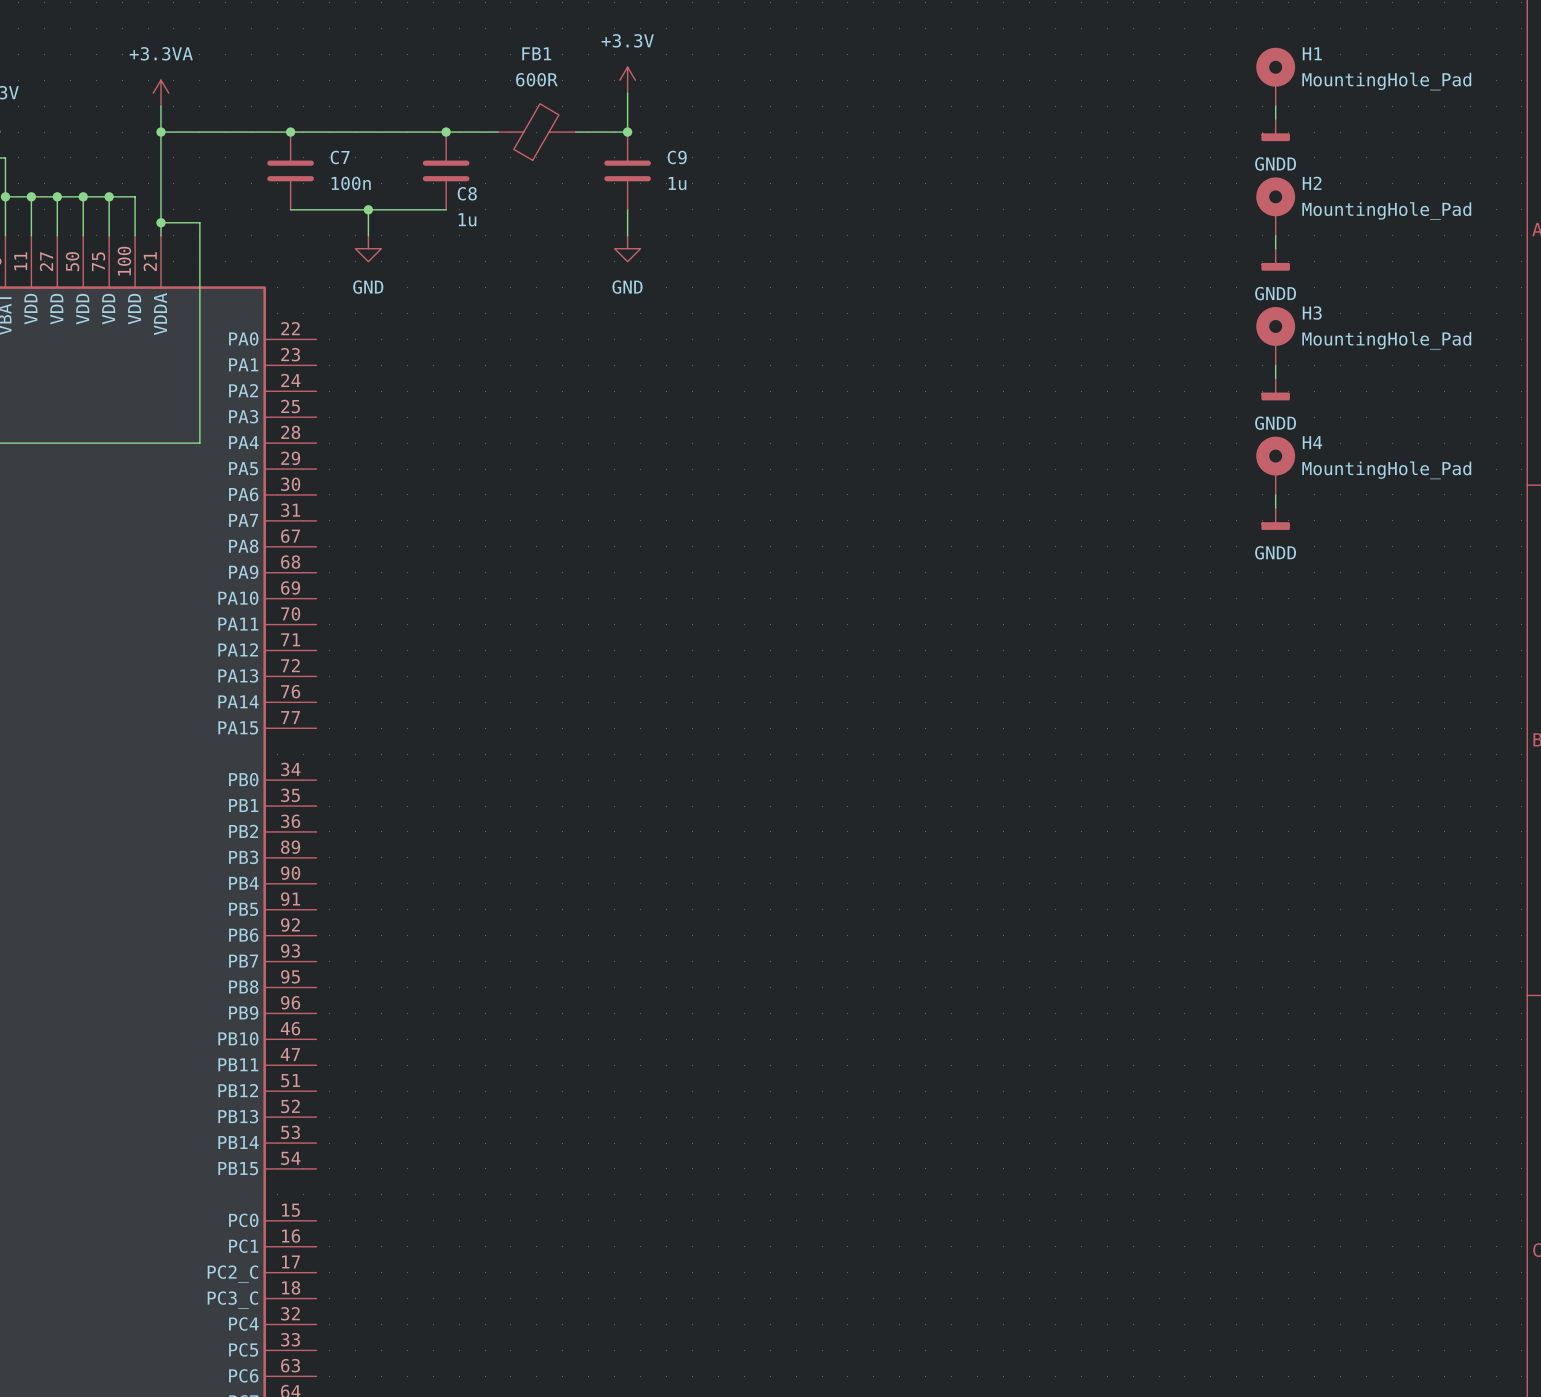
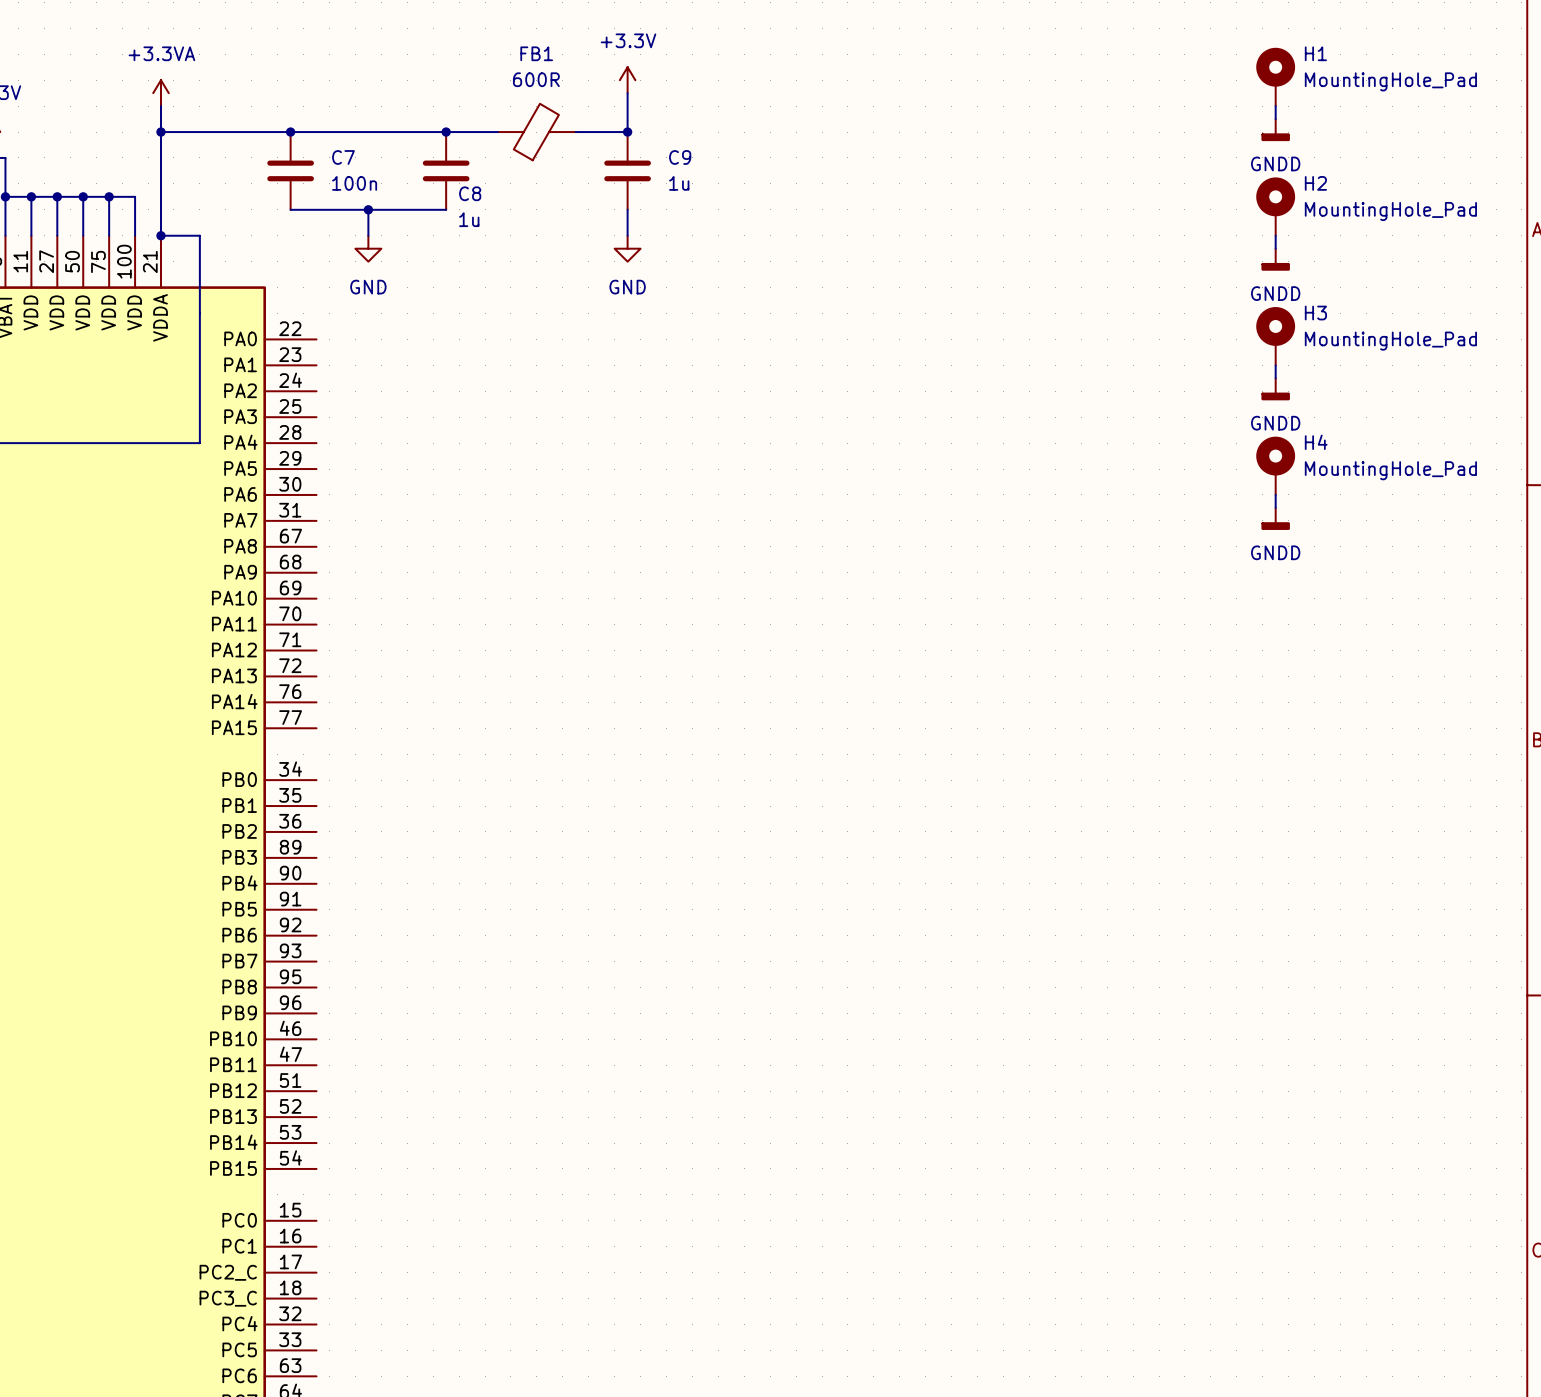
wire: (161, 222) (199, 222) (199, 235) -> (161, 235) (199, 235)
junction position: (161, 222) -> (161, 235)

